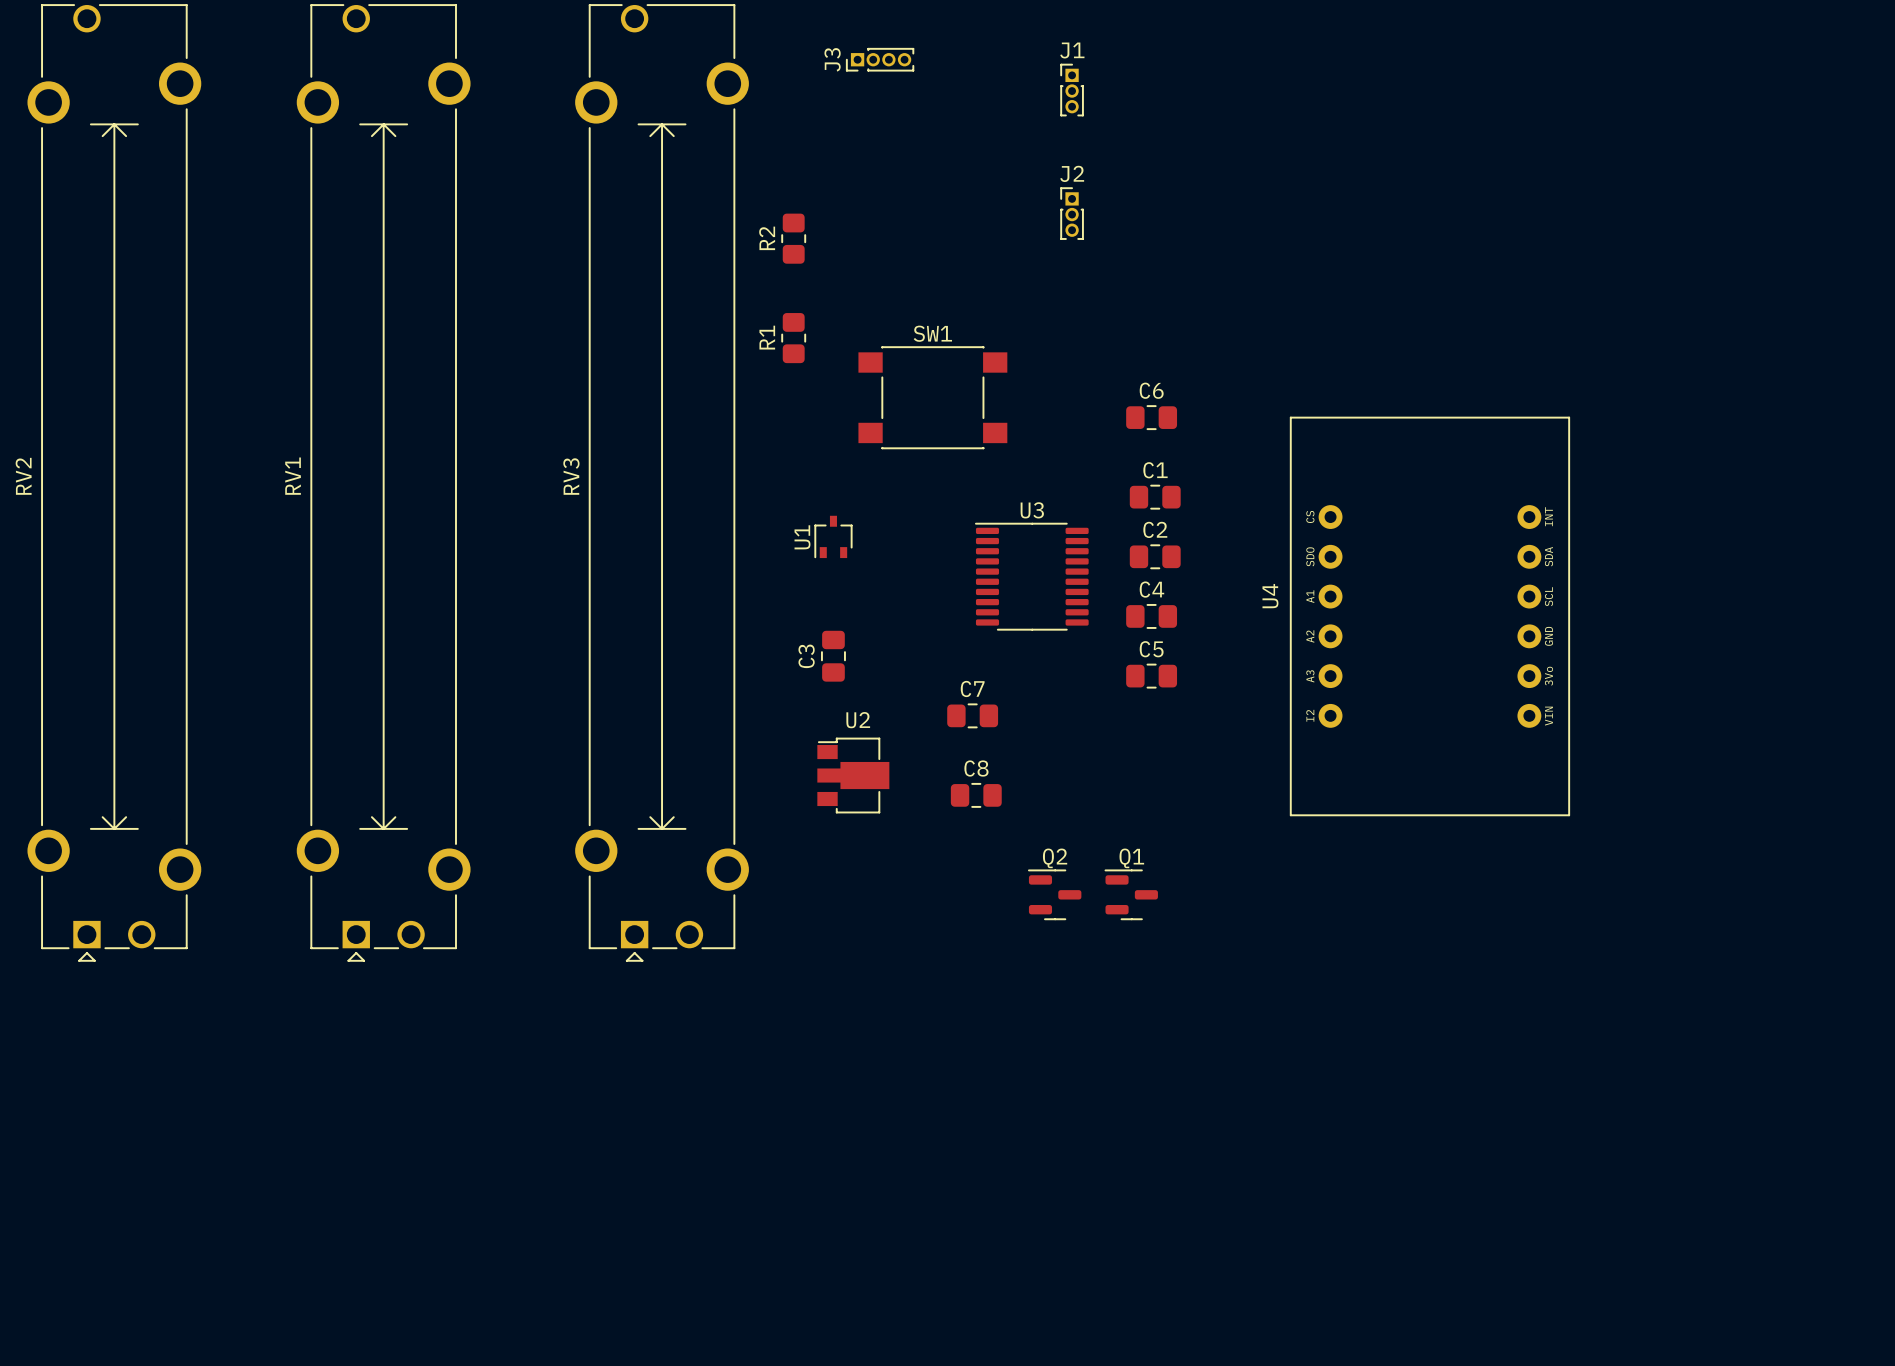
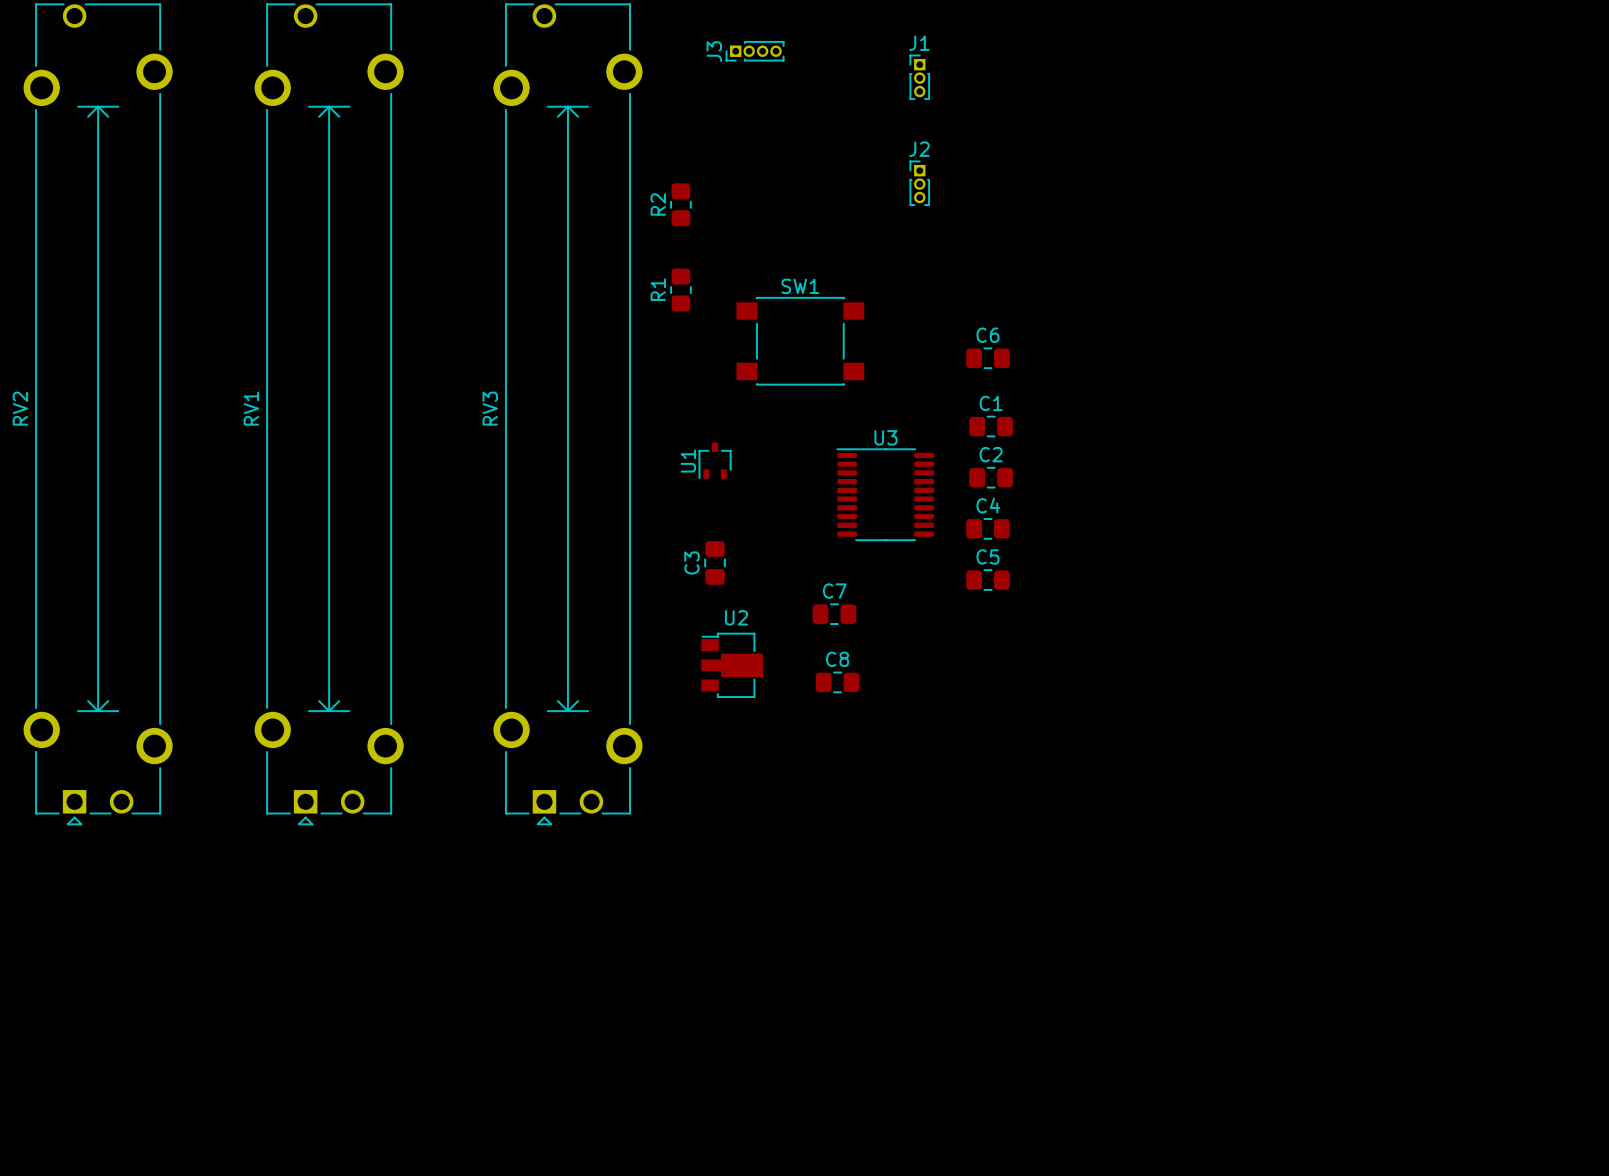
U4: (1429, 616) -> none
Q2: (1054, 894) -> none
Q1: (1131, 894) -> none

